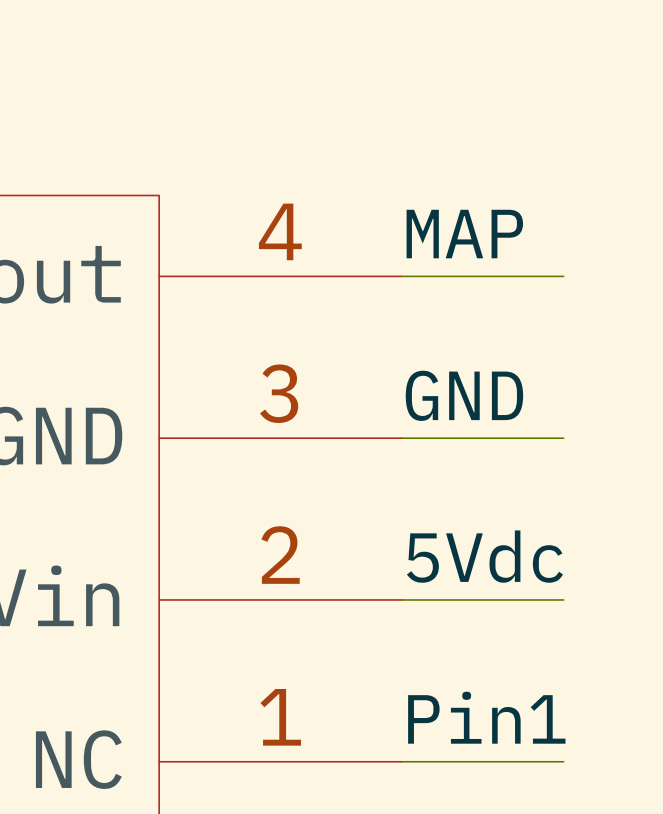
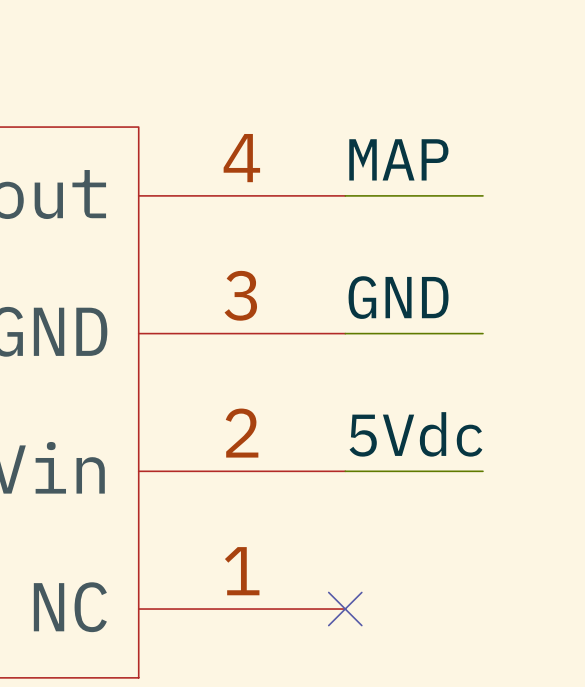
label: Pin1 (486, 717) -> none
wire: (401, 761) (563, 761) -> none
no-connect mark: none -> (345, 609)

